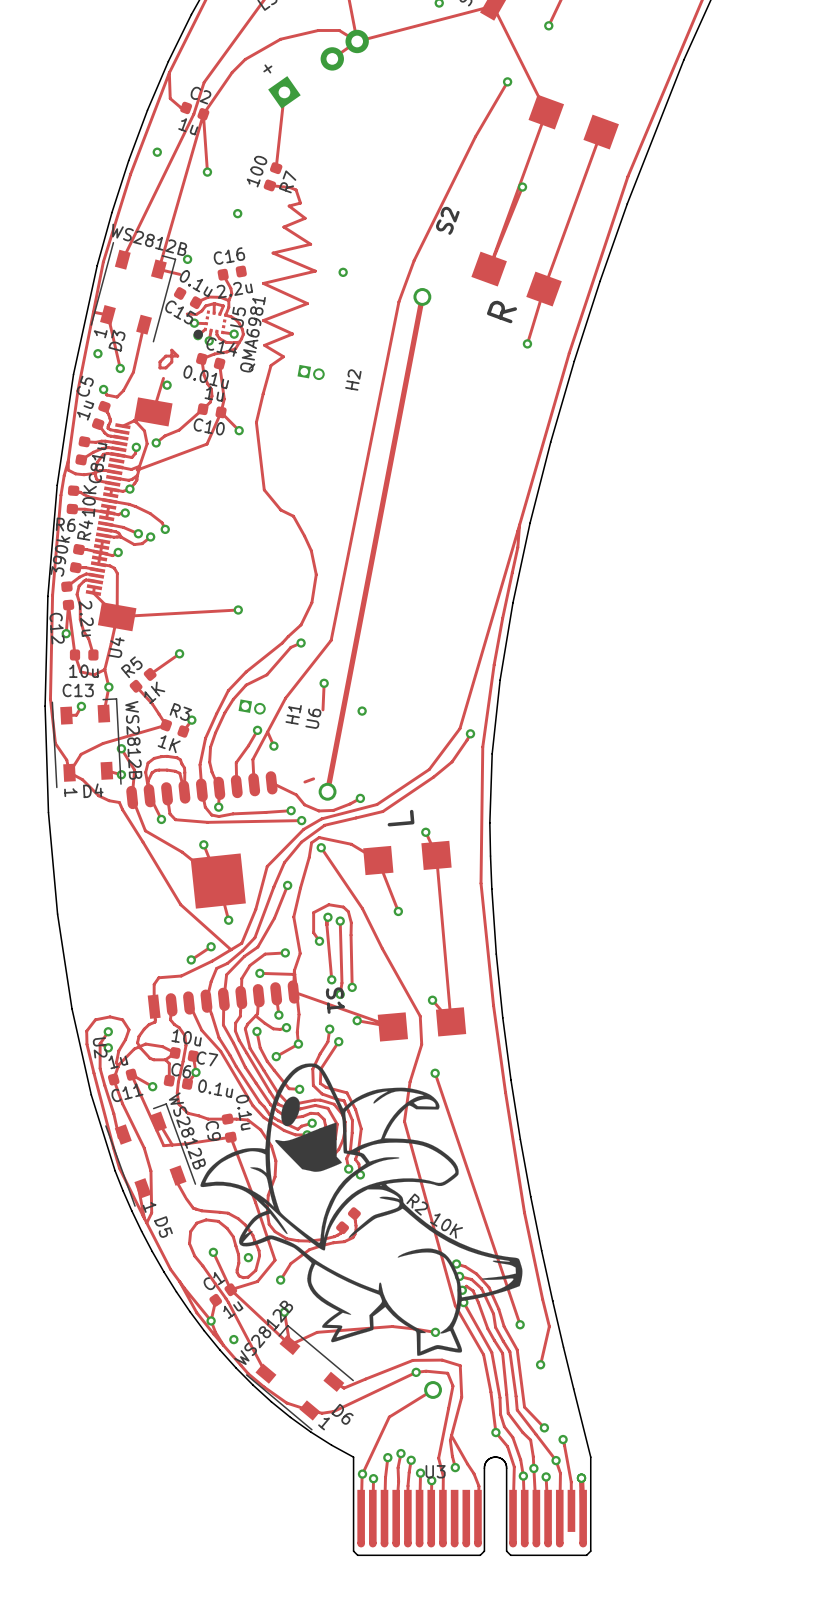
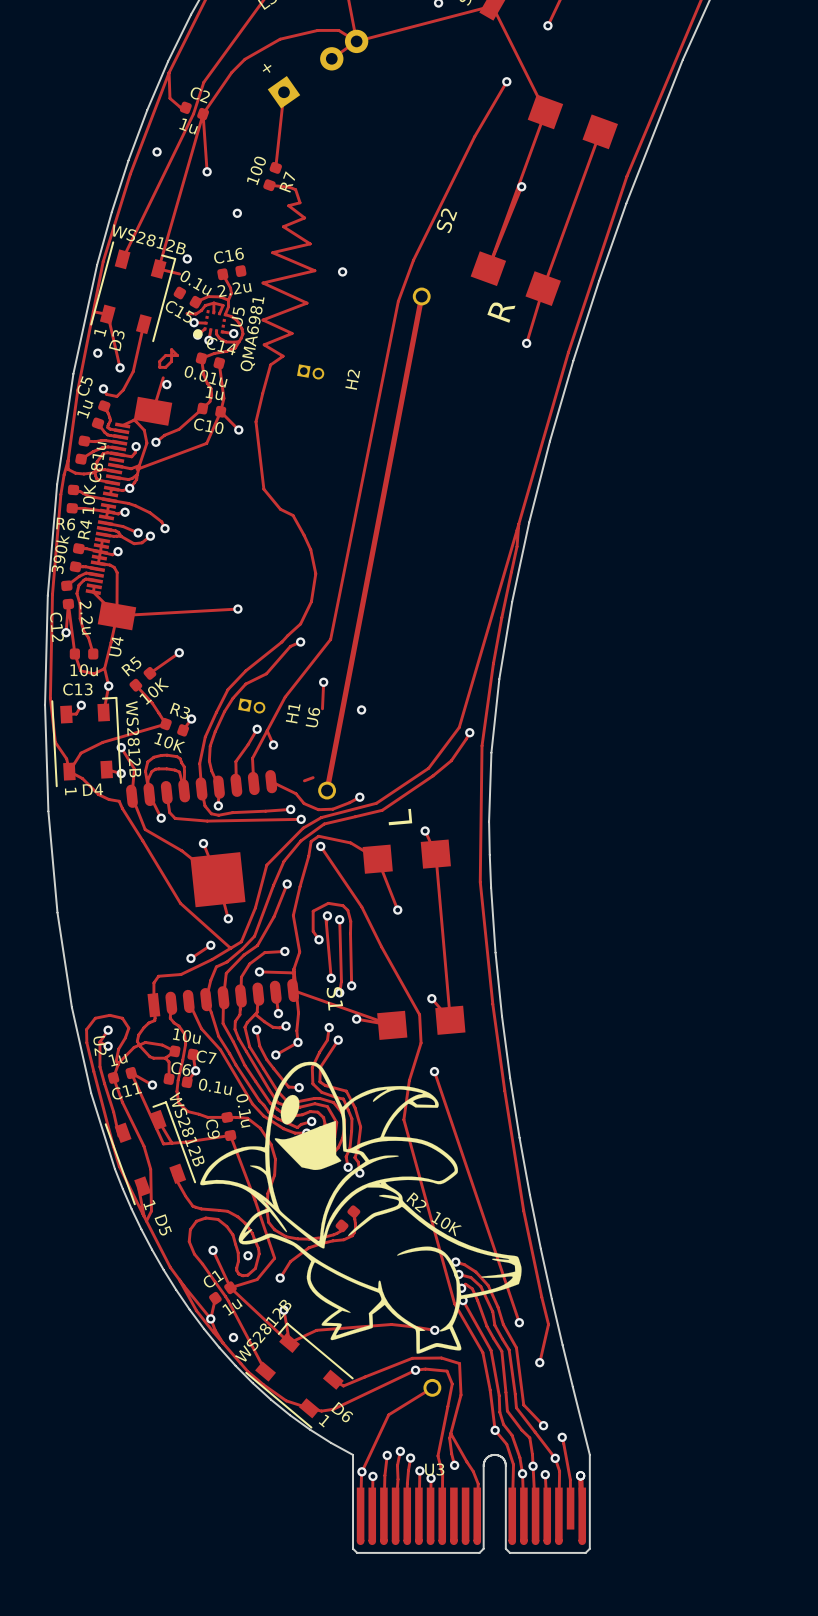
R5 value: 1K (154, 692) -> 10K (154, 691)
R3 value: 1K (169, 744) -> 10K (169, 743)

